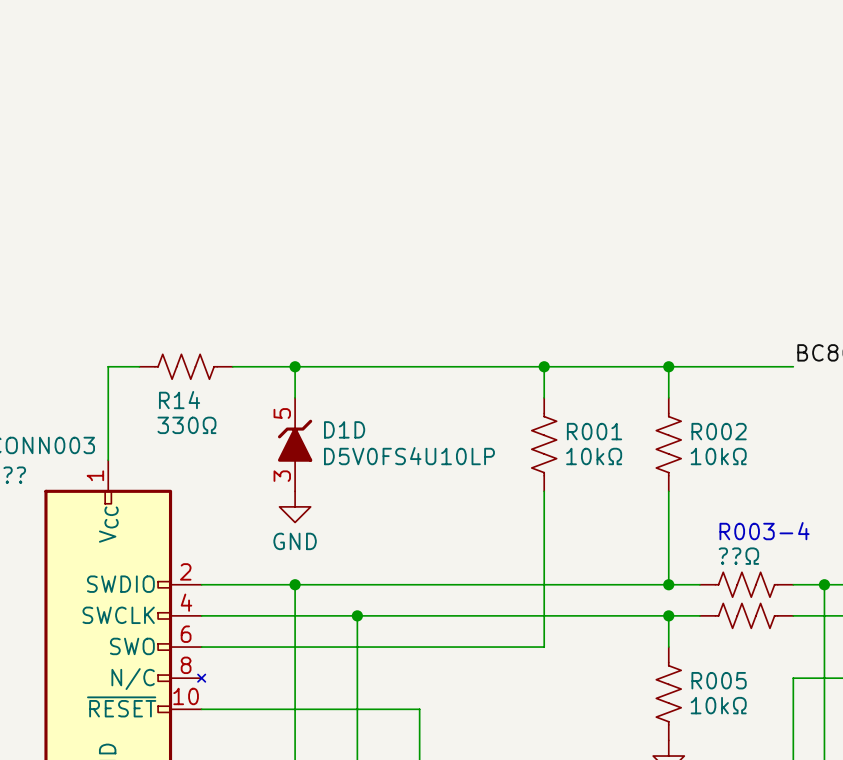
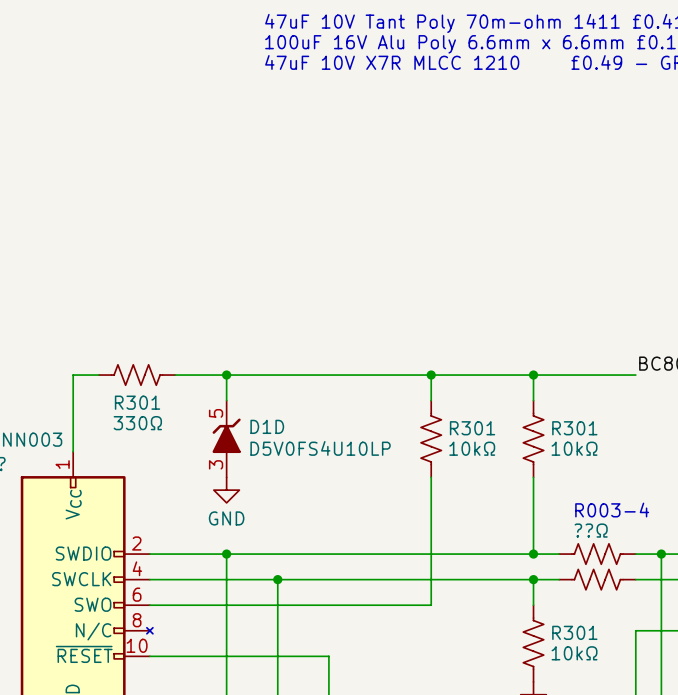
R14 name: R14 (179, 400) -> R301 (137, 402)
R001 name: R001 (594, 431) -> R301 (472, 428)
R002 name: R002 (719, 431) -> R301 (574, 428)
R005 name: R005 (719, 680) -> R301 (574, 632)

